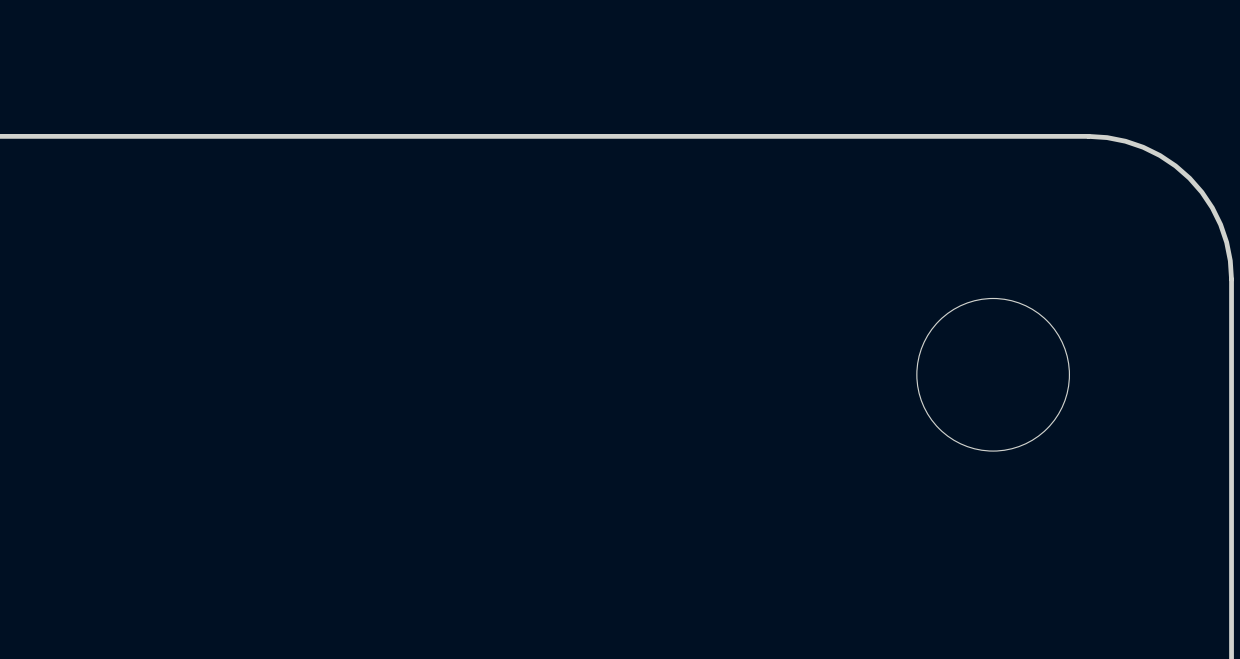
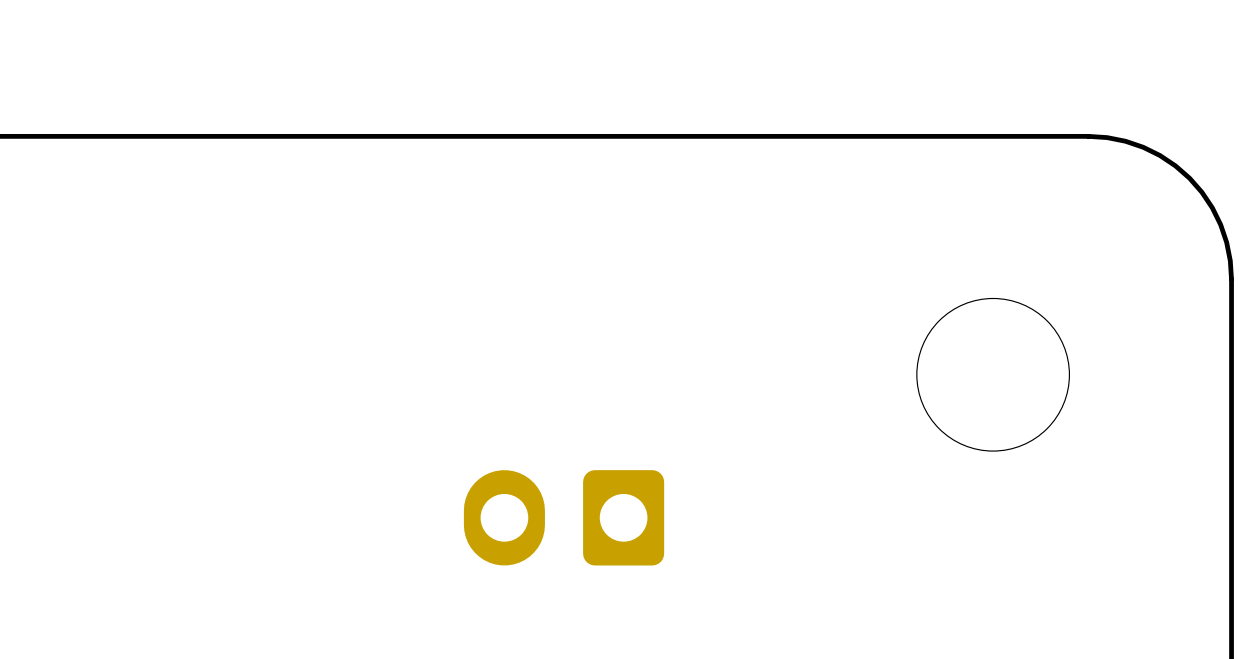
part: none -> (564, 517)

